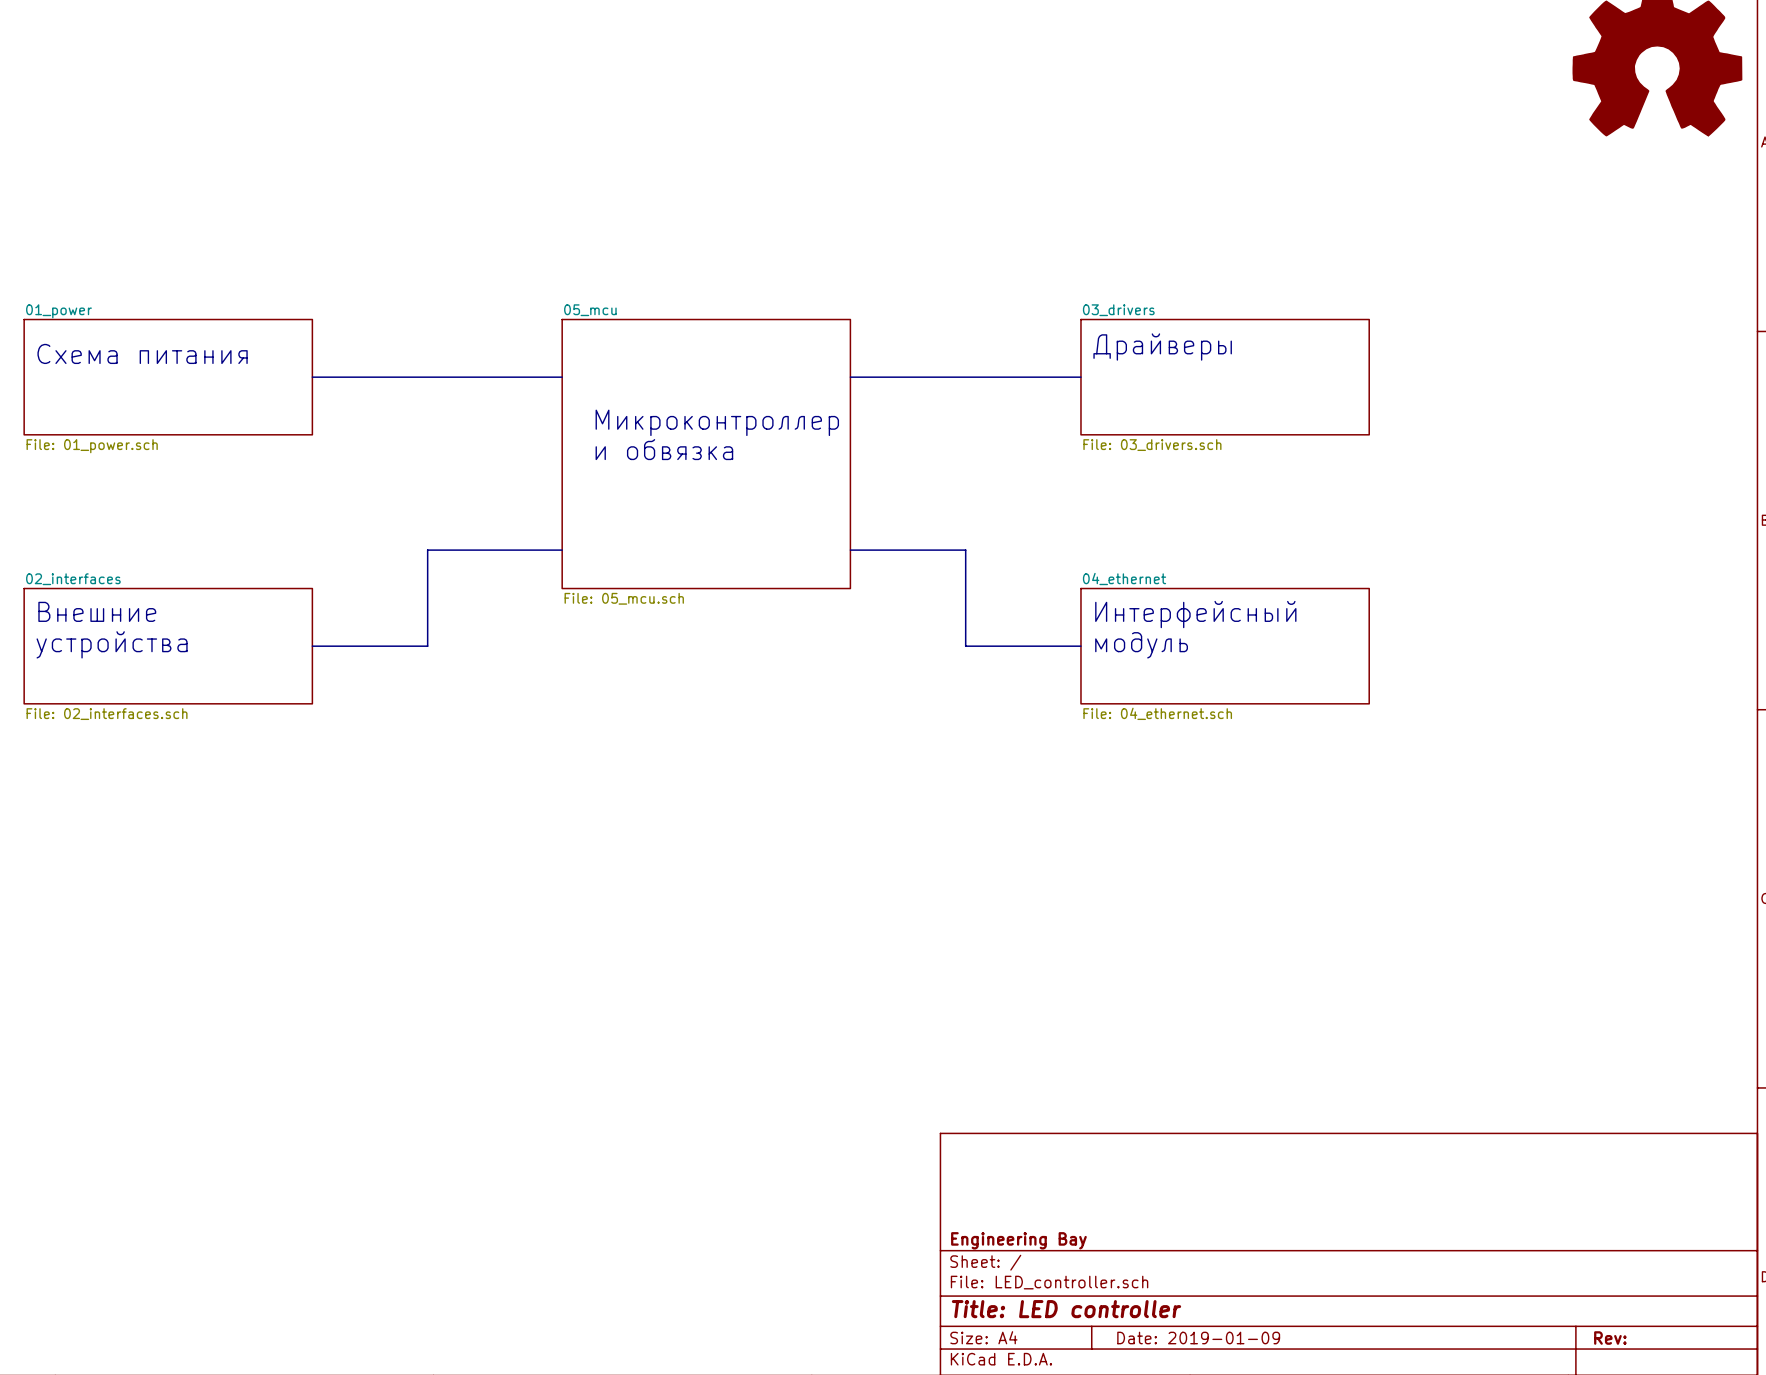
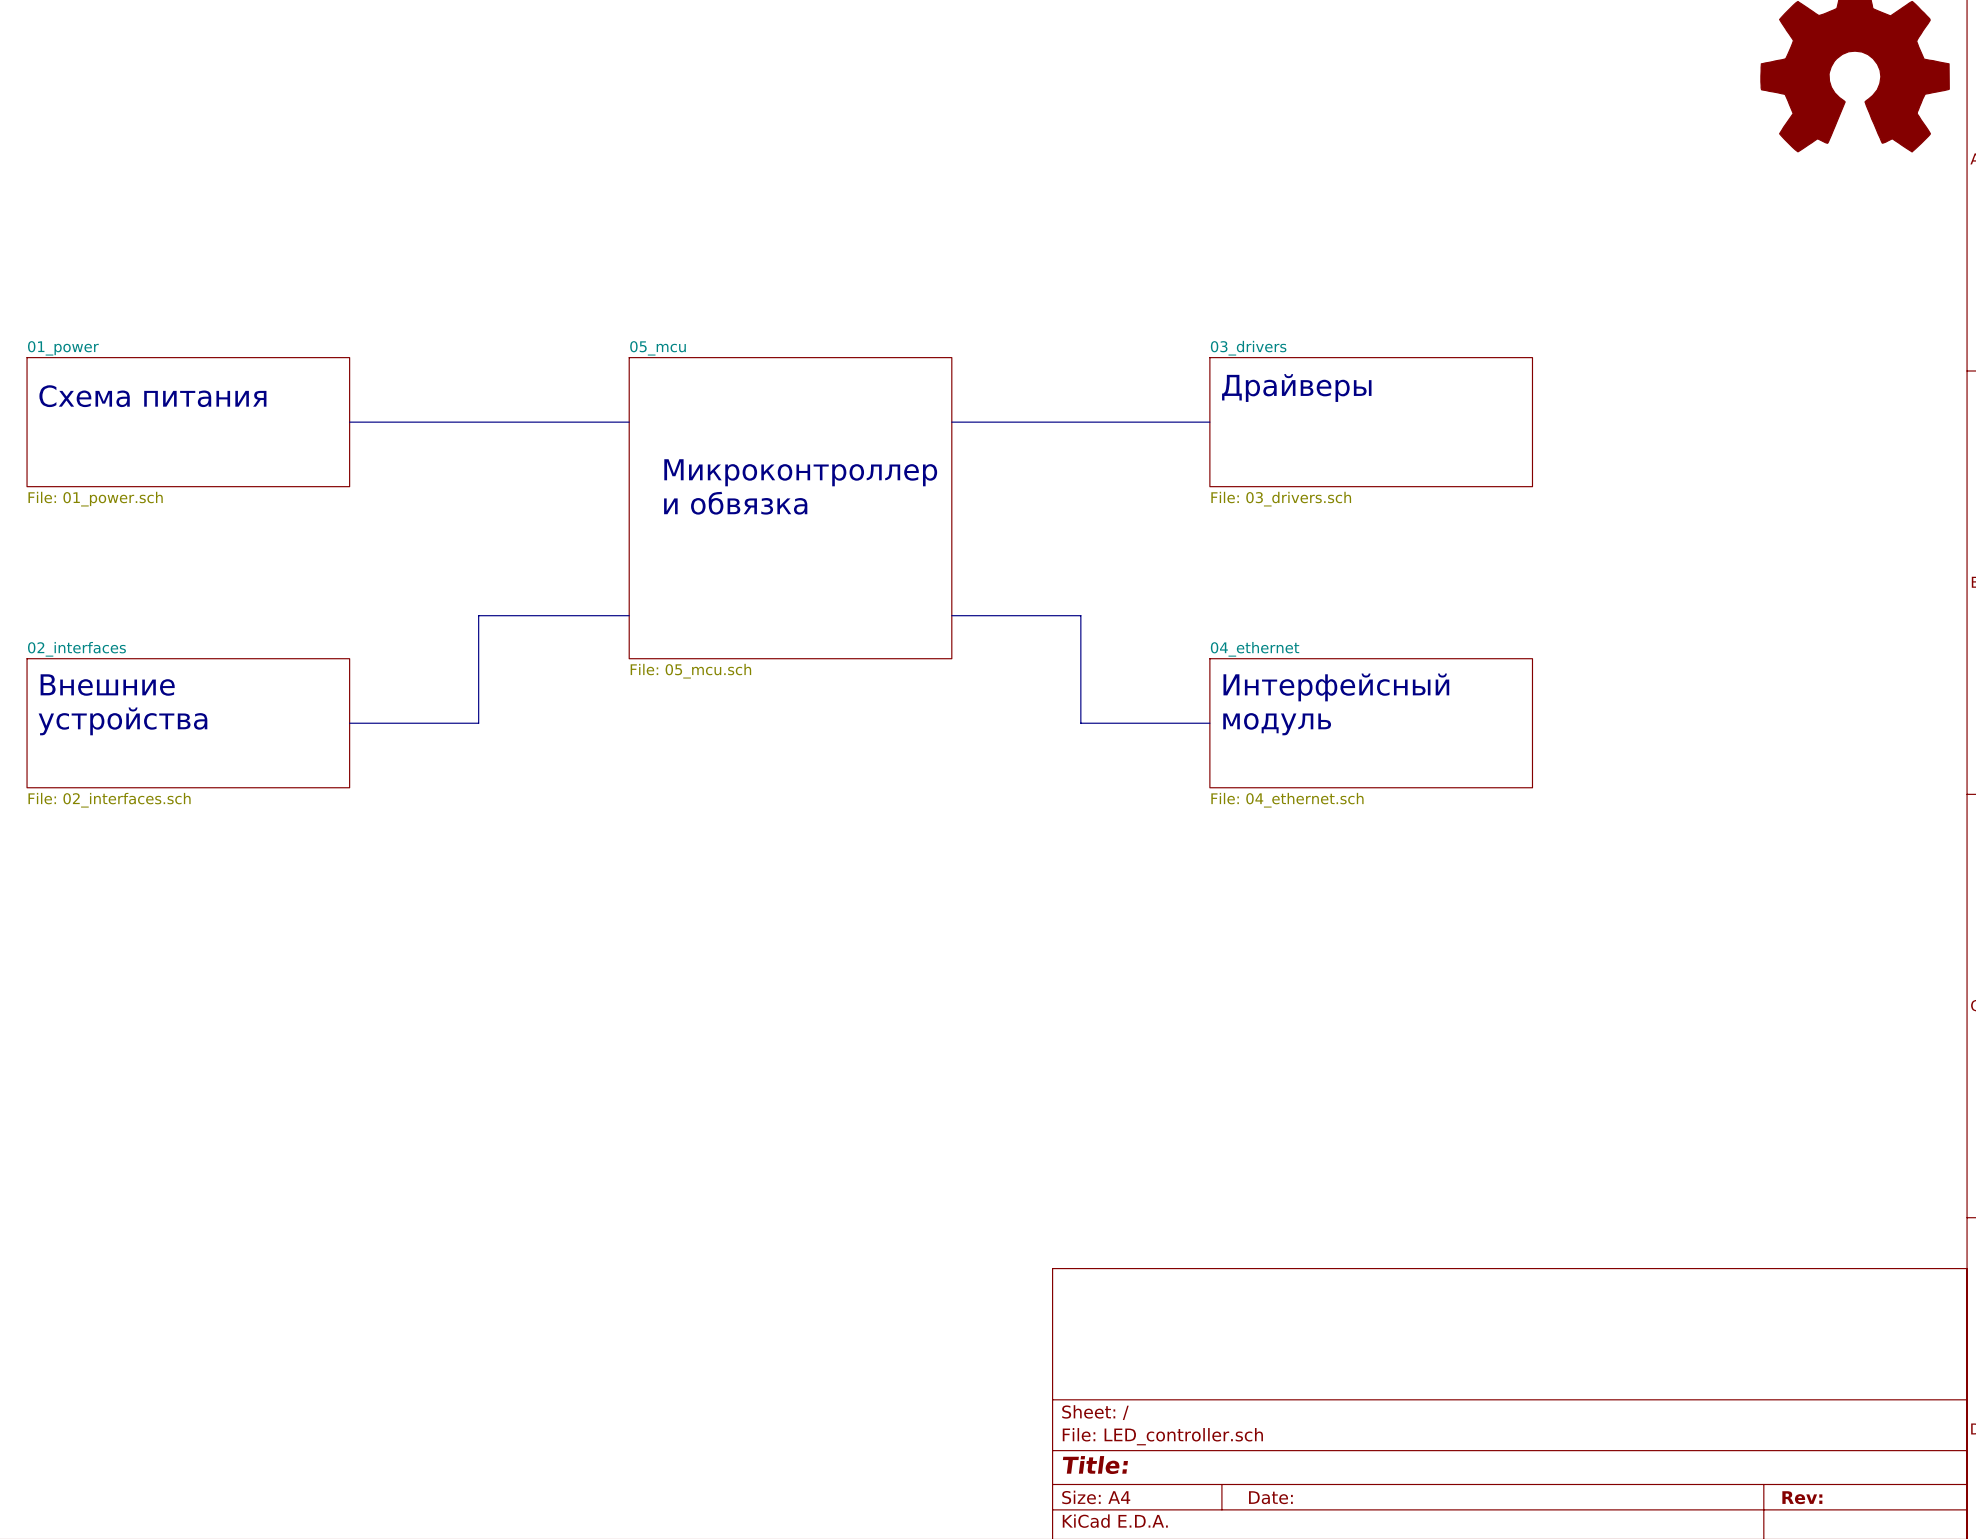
title block: Engineering Bay (1018, 1240) -> none
title block: Title: LED controller (1066, 1309) -> Title: (1095, 1465)
title block: Date: 2019-01-09 (1198, 1338) -> Date: (1270, 1497)

